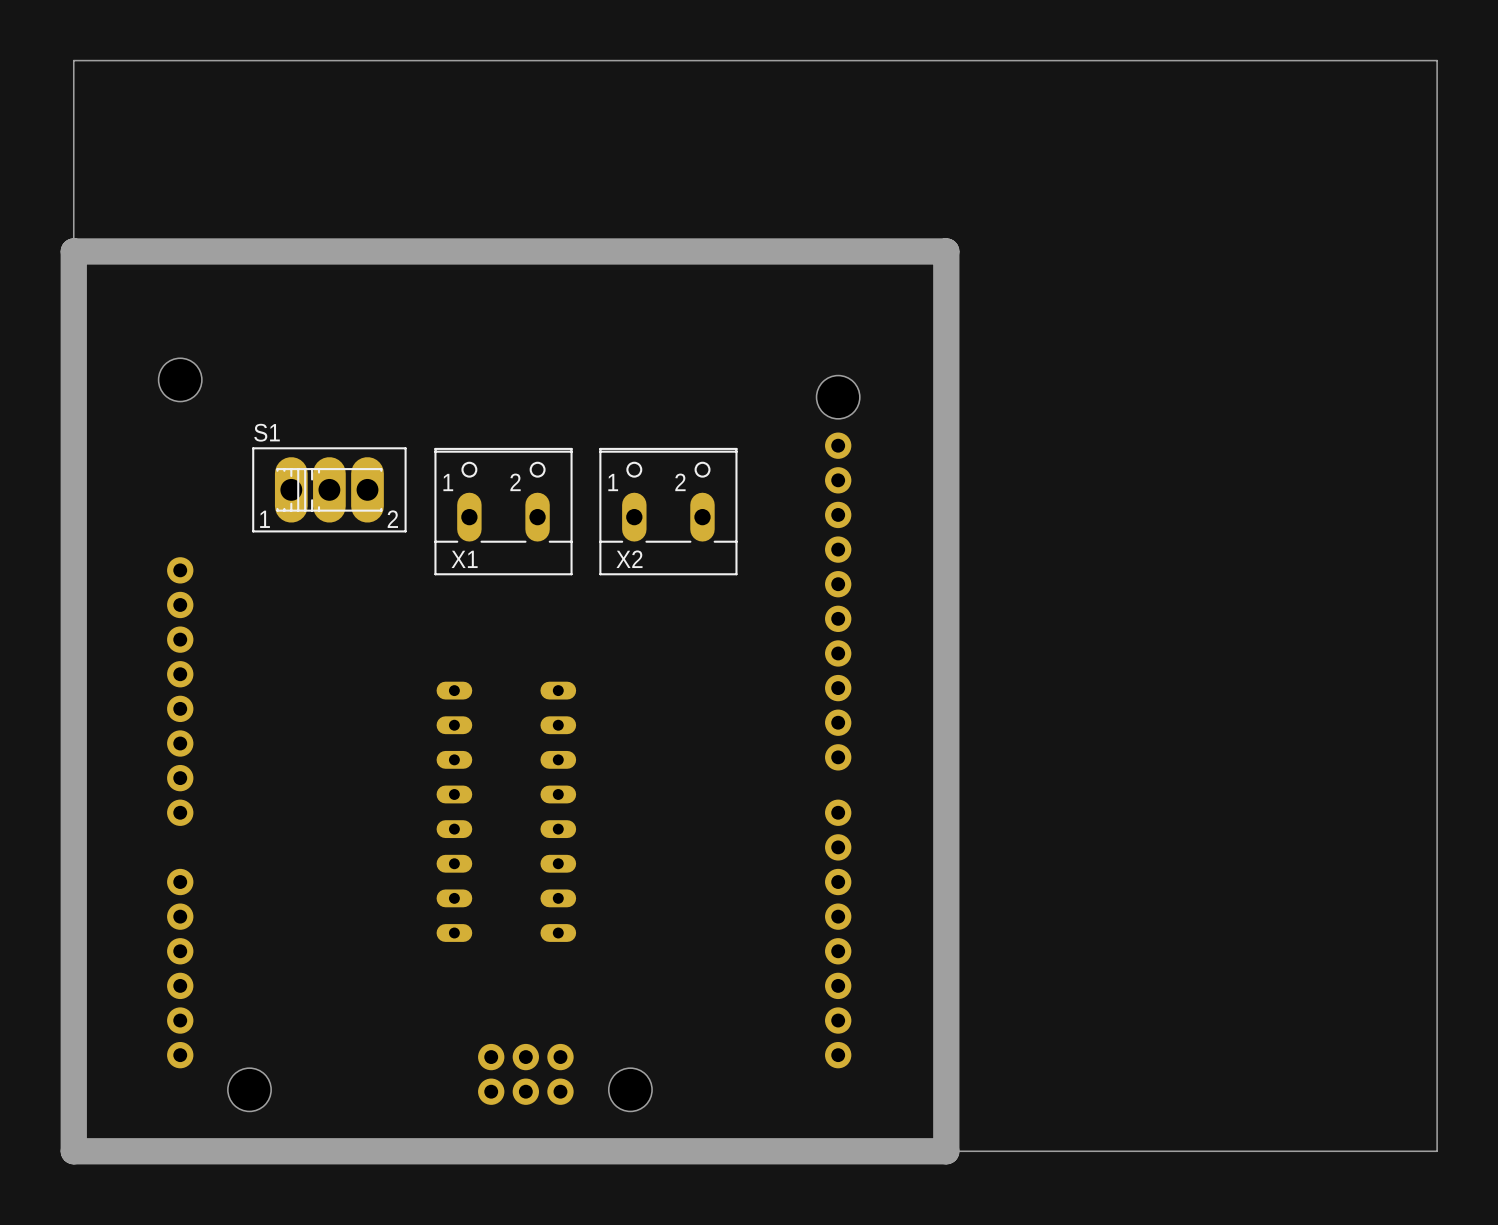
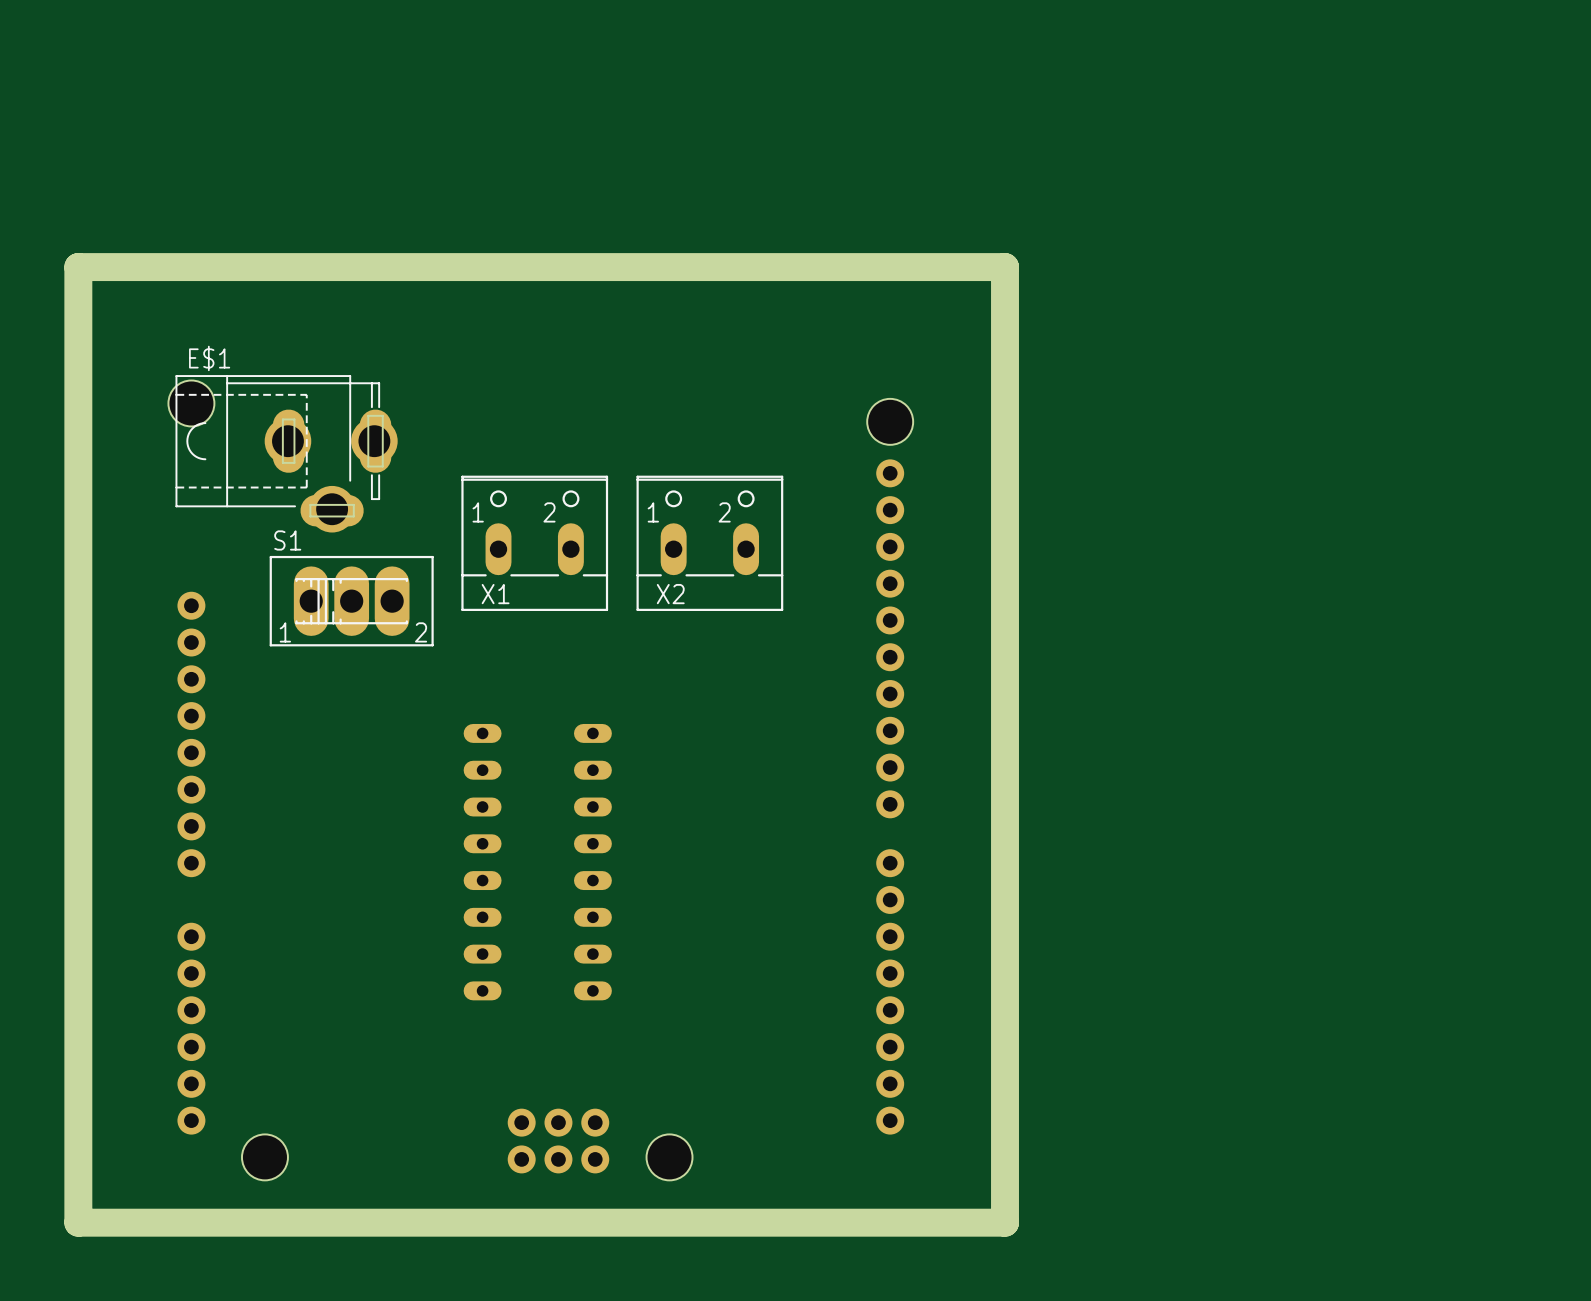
board edge: (73, 251) (73, 60) (1437, 60) (1437, 1151) (946, 1151) -> none
E$1: none -> (286, 453)
S1 position: (329, 489) -> (351, 601)

